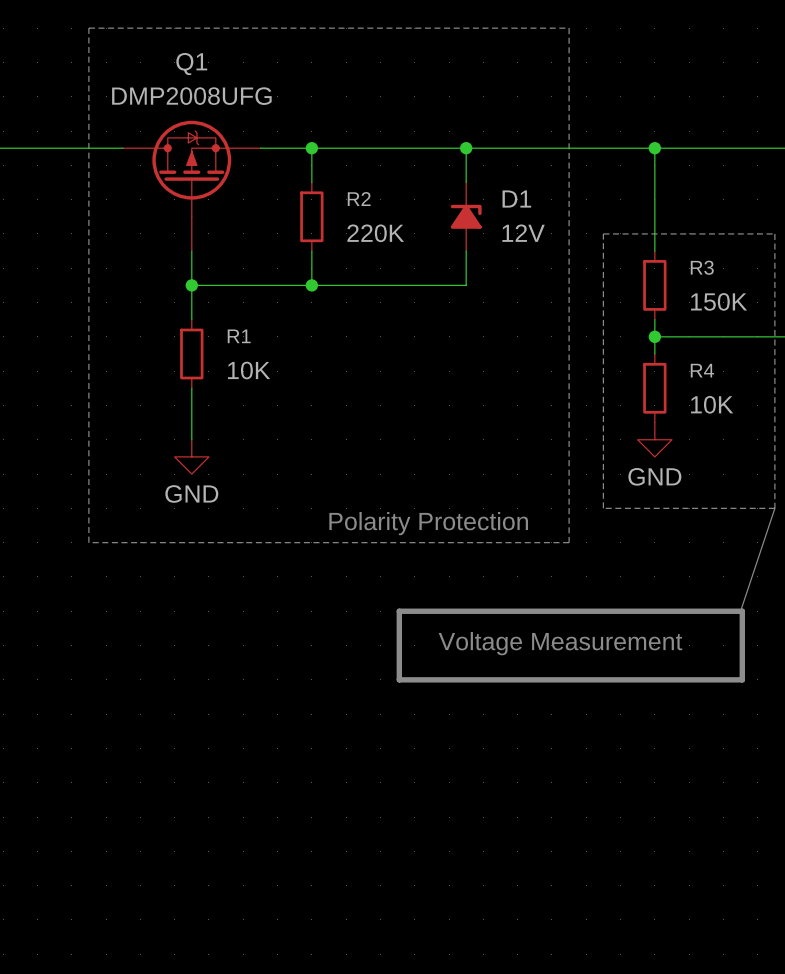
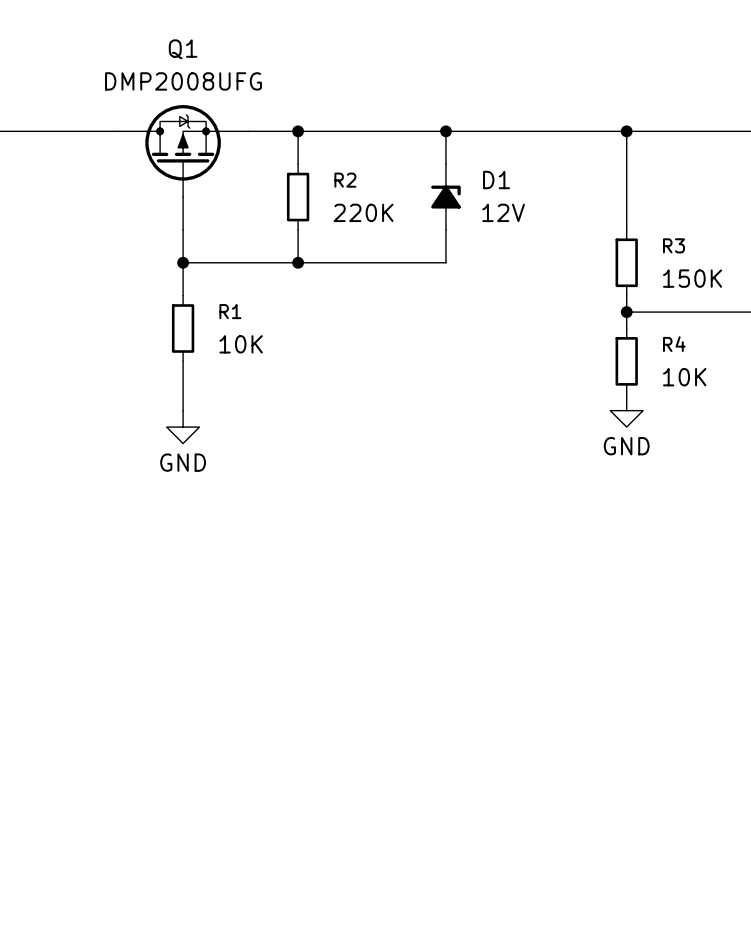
line: (88, 28) (569, 28) (569, 542) (88, 542) (88, 28) -> none
line: (774, 508) (774, 233) (603, 233) (603, 508) (774, 508) -> none
line: (774, 508) (740, 611) -> none
text: Polarity Protection (428, 523) -> none
line: (399, 611) (742, 611) (742, 679) (399, 679) (399, 611) -> none
text: Voltage Measurement (560, 643) -> none

